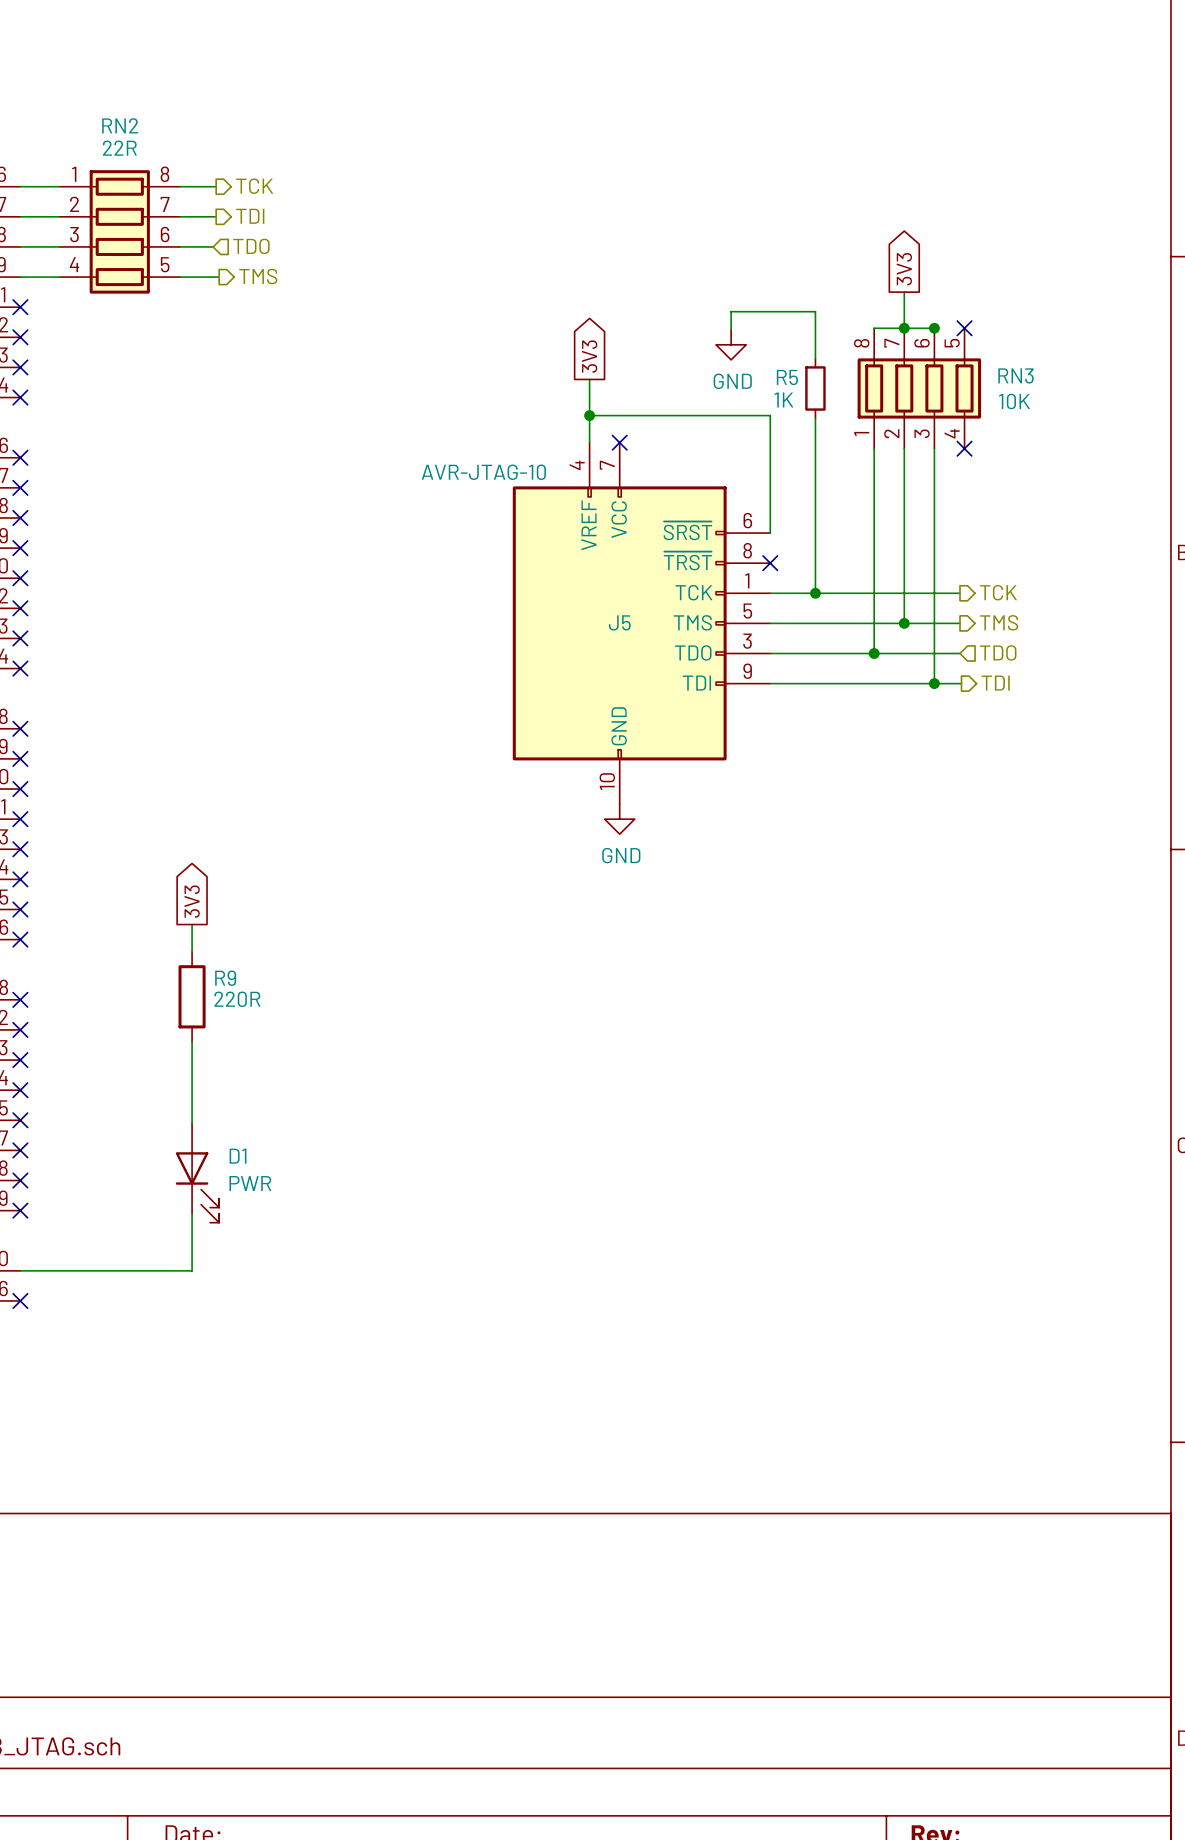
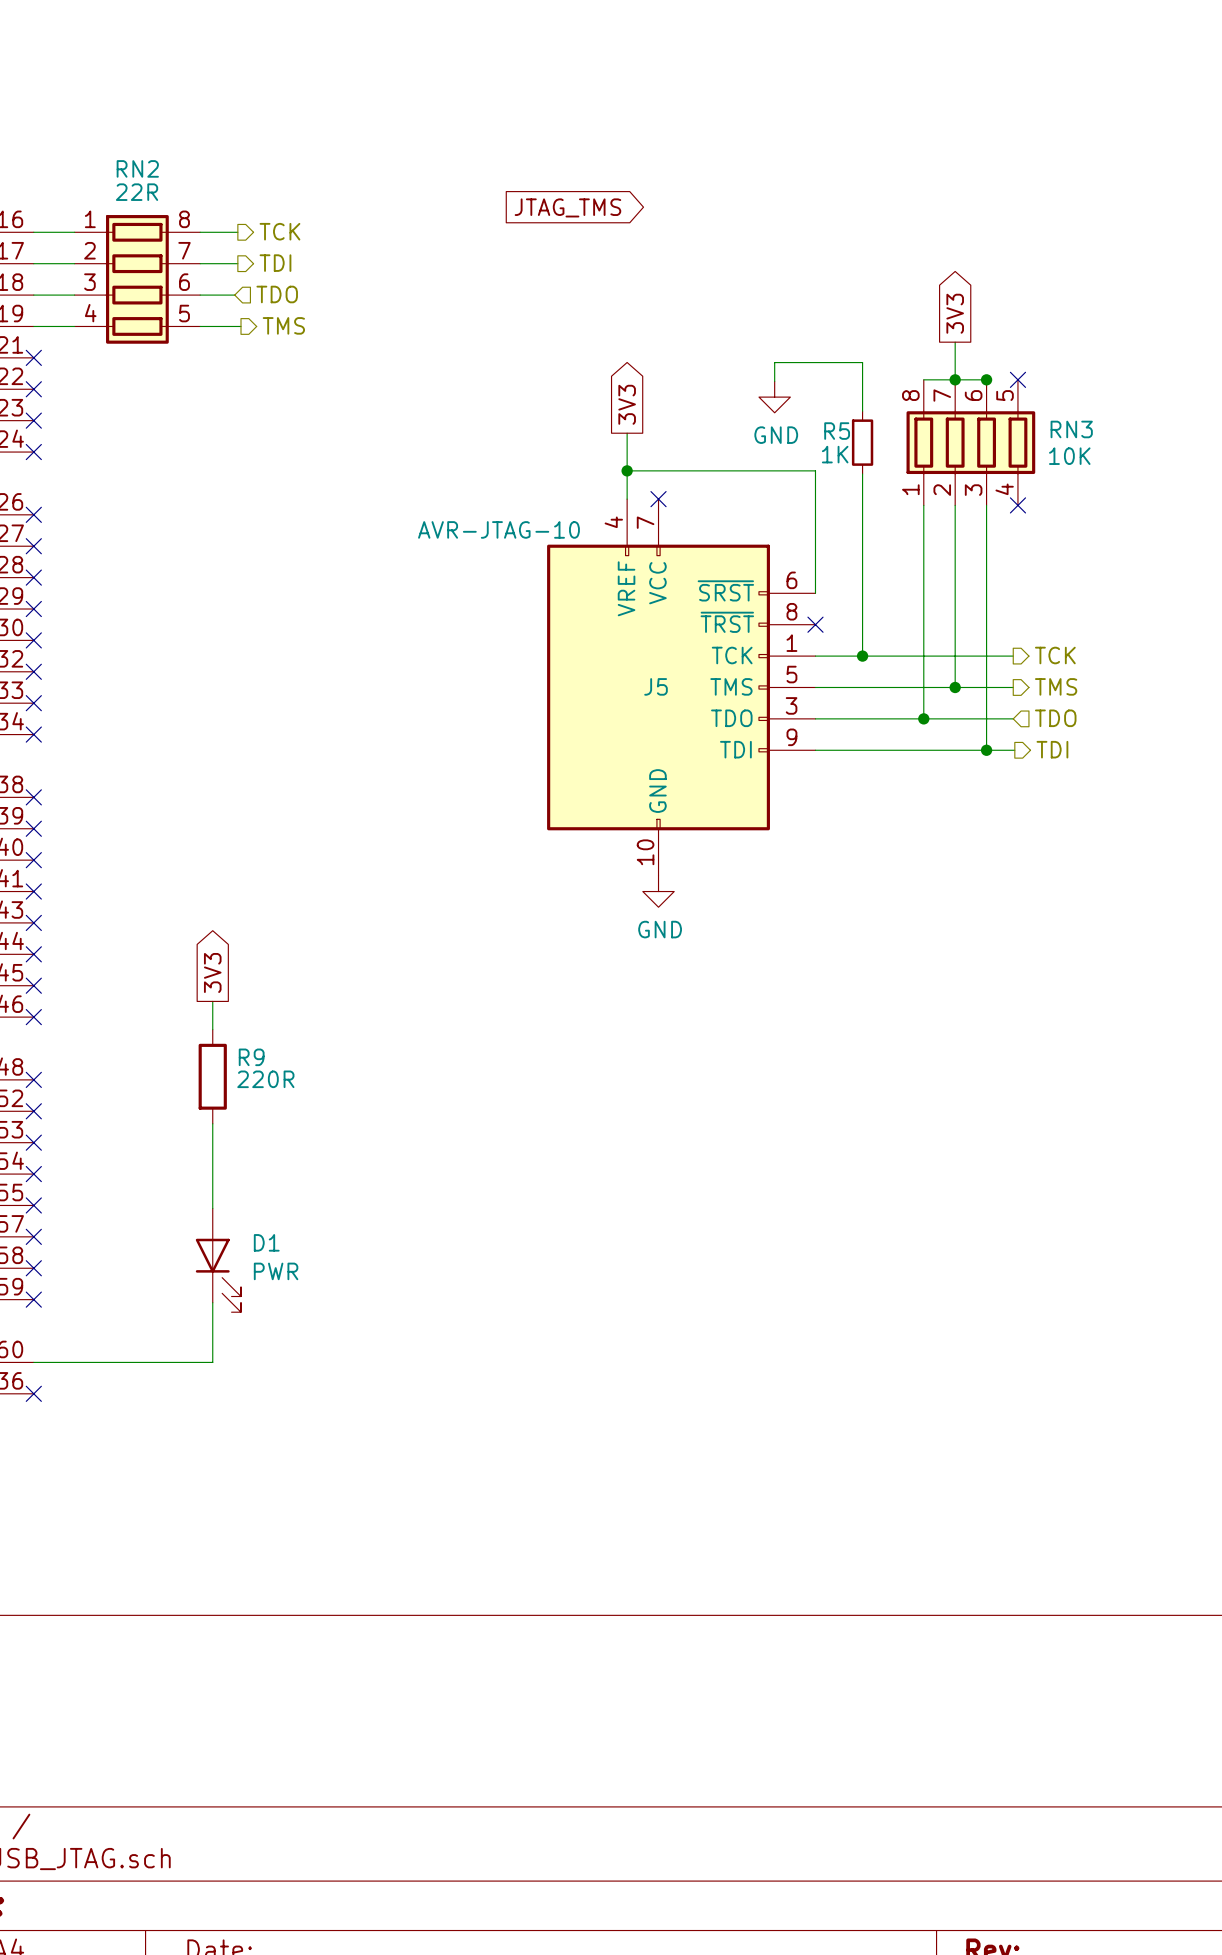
global label: none -> JTAG_TMS (567, 207)

